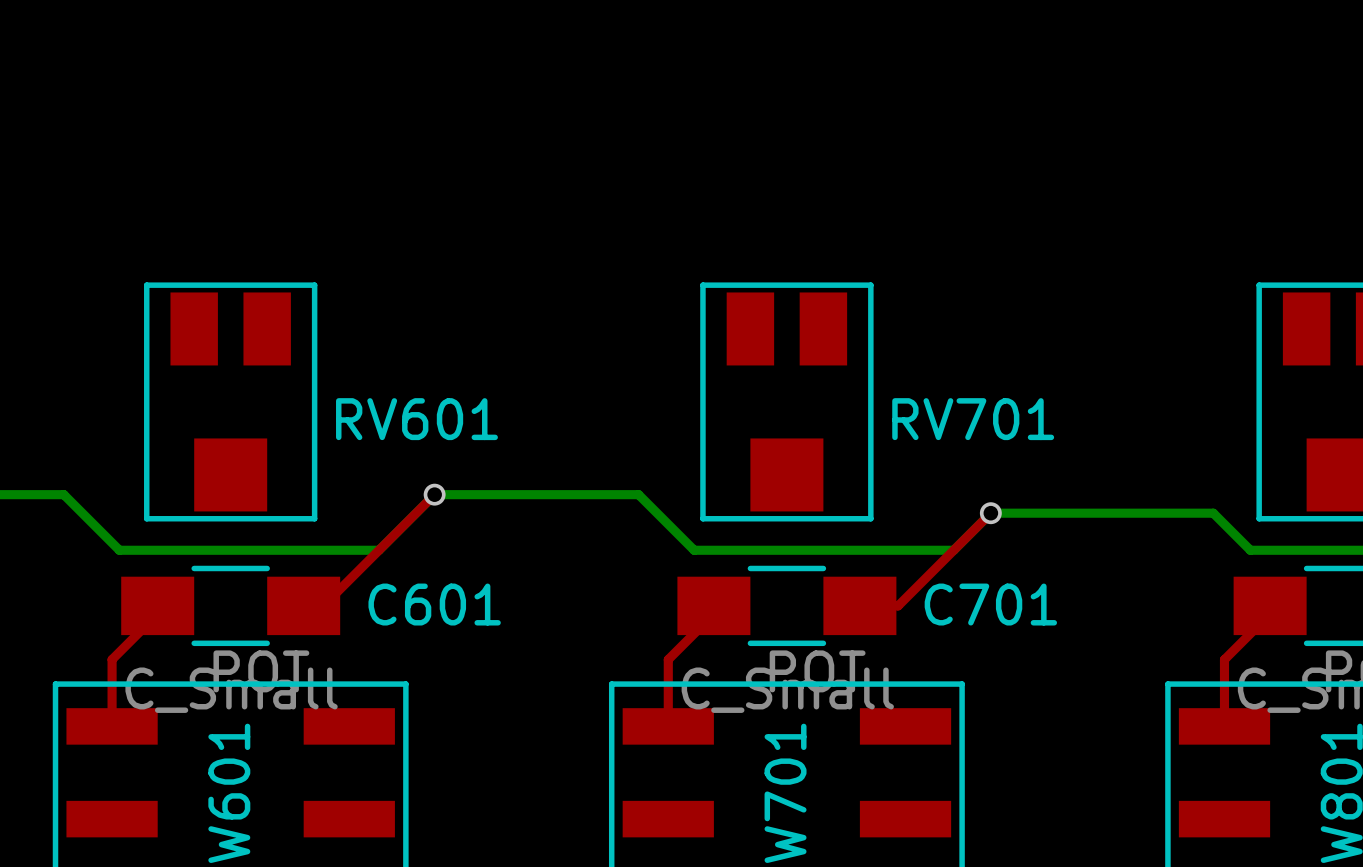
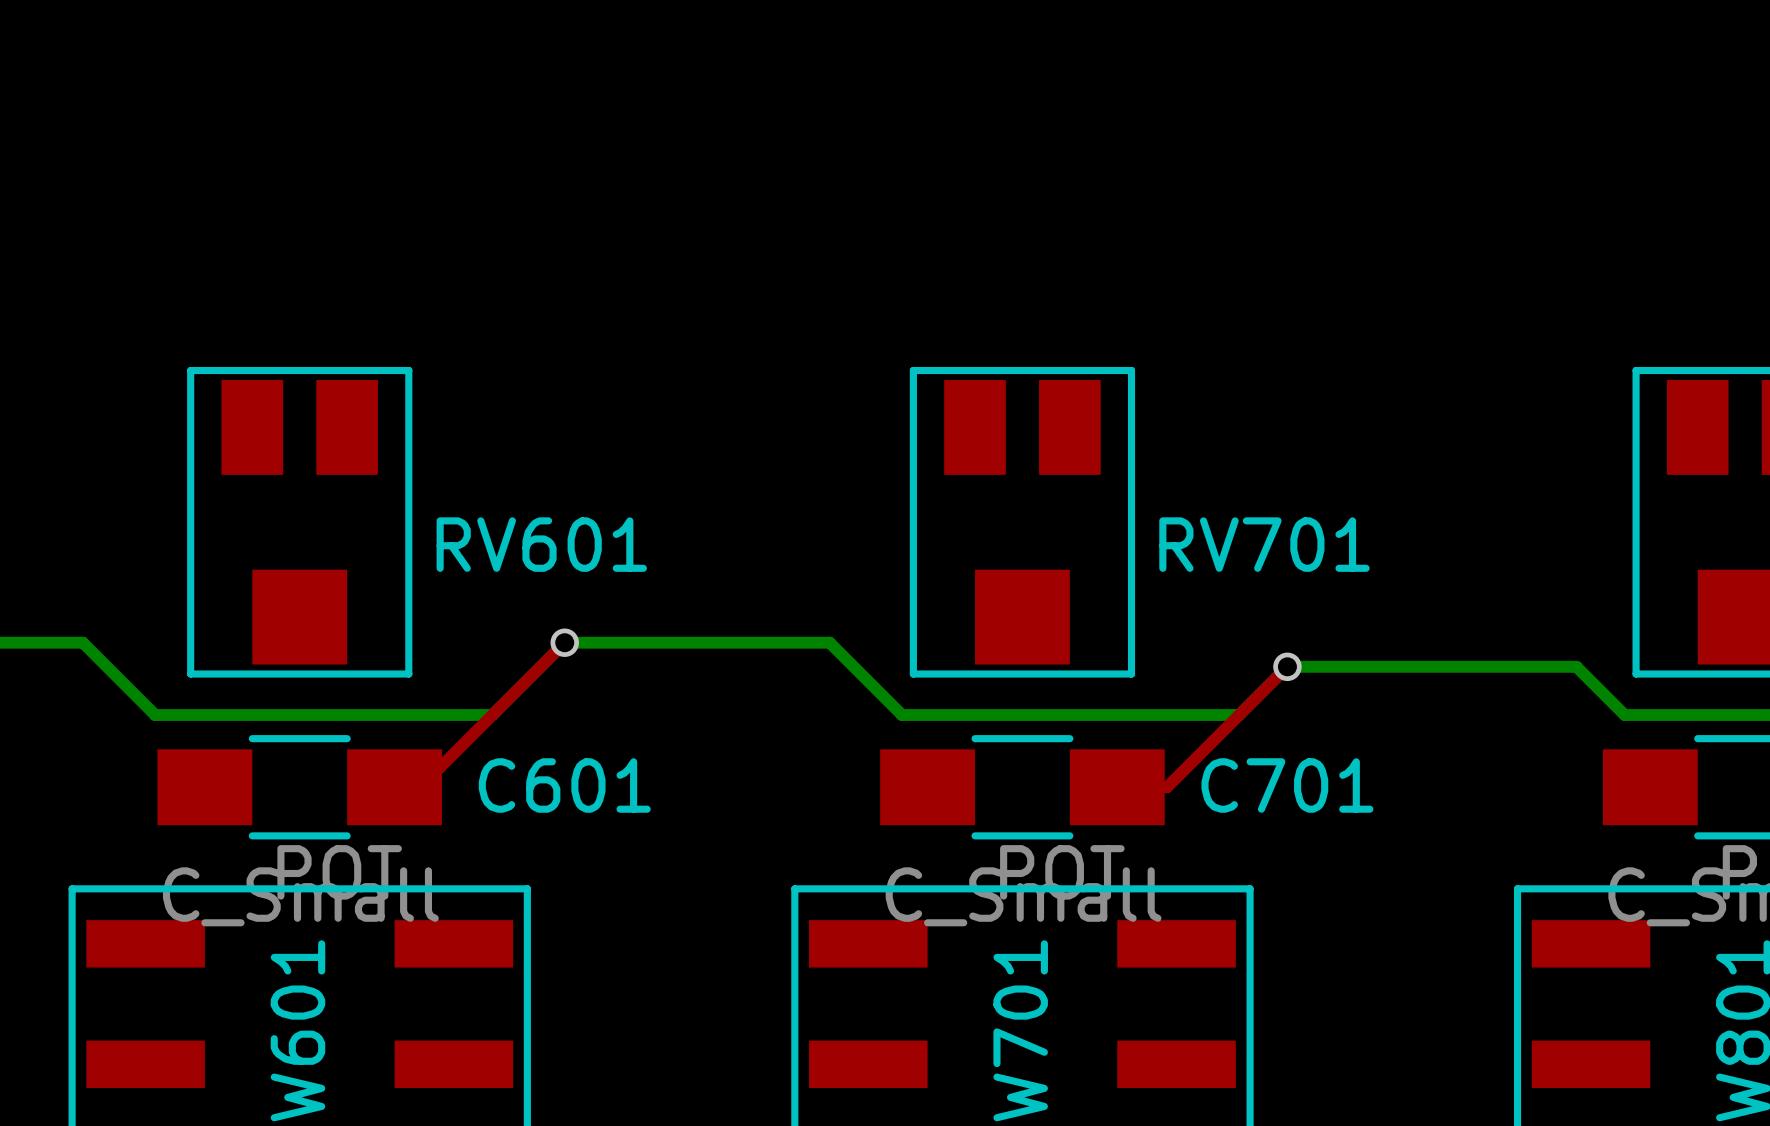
top track: (157, 605) (157, 614) (112, 659) (112, 726) -> none
top track: (713, 605) (713, 614) (668, 659) (668, 726) -> none
top track: (1270, 605) (1270, 614) (1224, 659) (1224, 726) -> none

